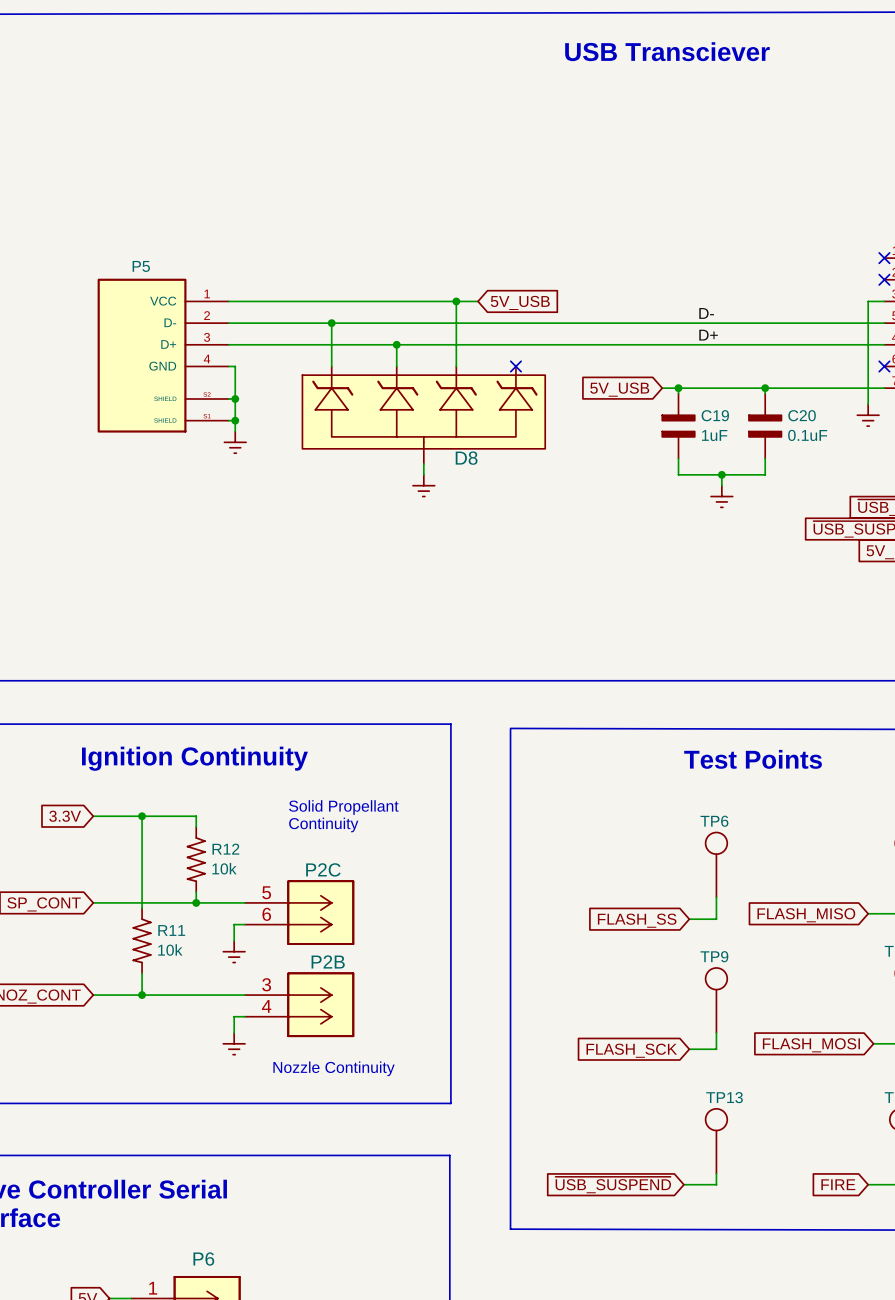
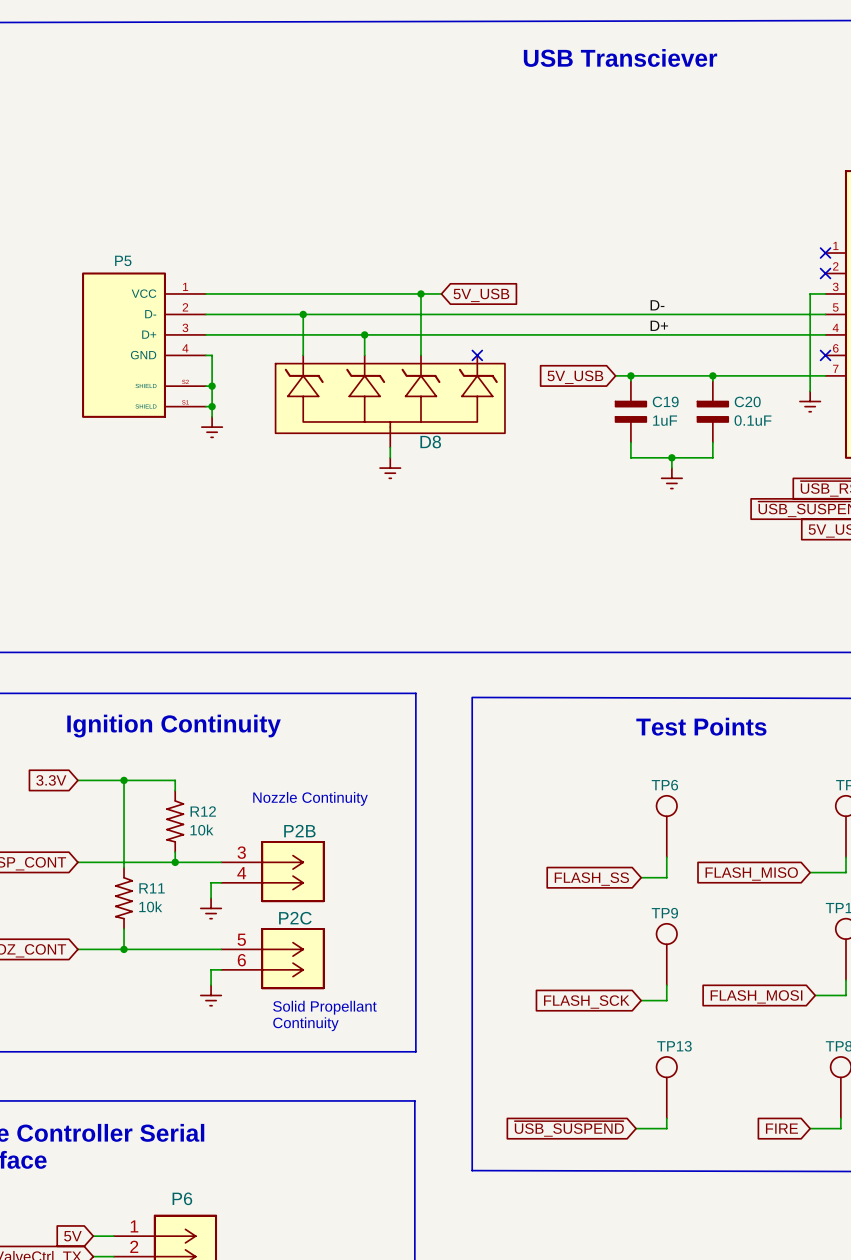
text: Solid Propellant (343, 807) -> none
text: Continuity (323, 824) -> Nozzle Continuity (310, 798)
P2C position: (299, 912) -> (272, 958)
P2B position: (299, 1004) -> (272, 871)
text: none -> Solid Propellant (324, 1007)
text: Nozzle Continuity (334, 1068) -> Continuity (305, 1024)

